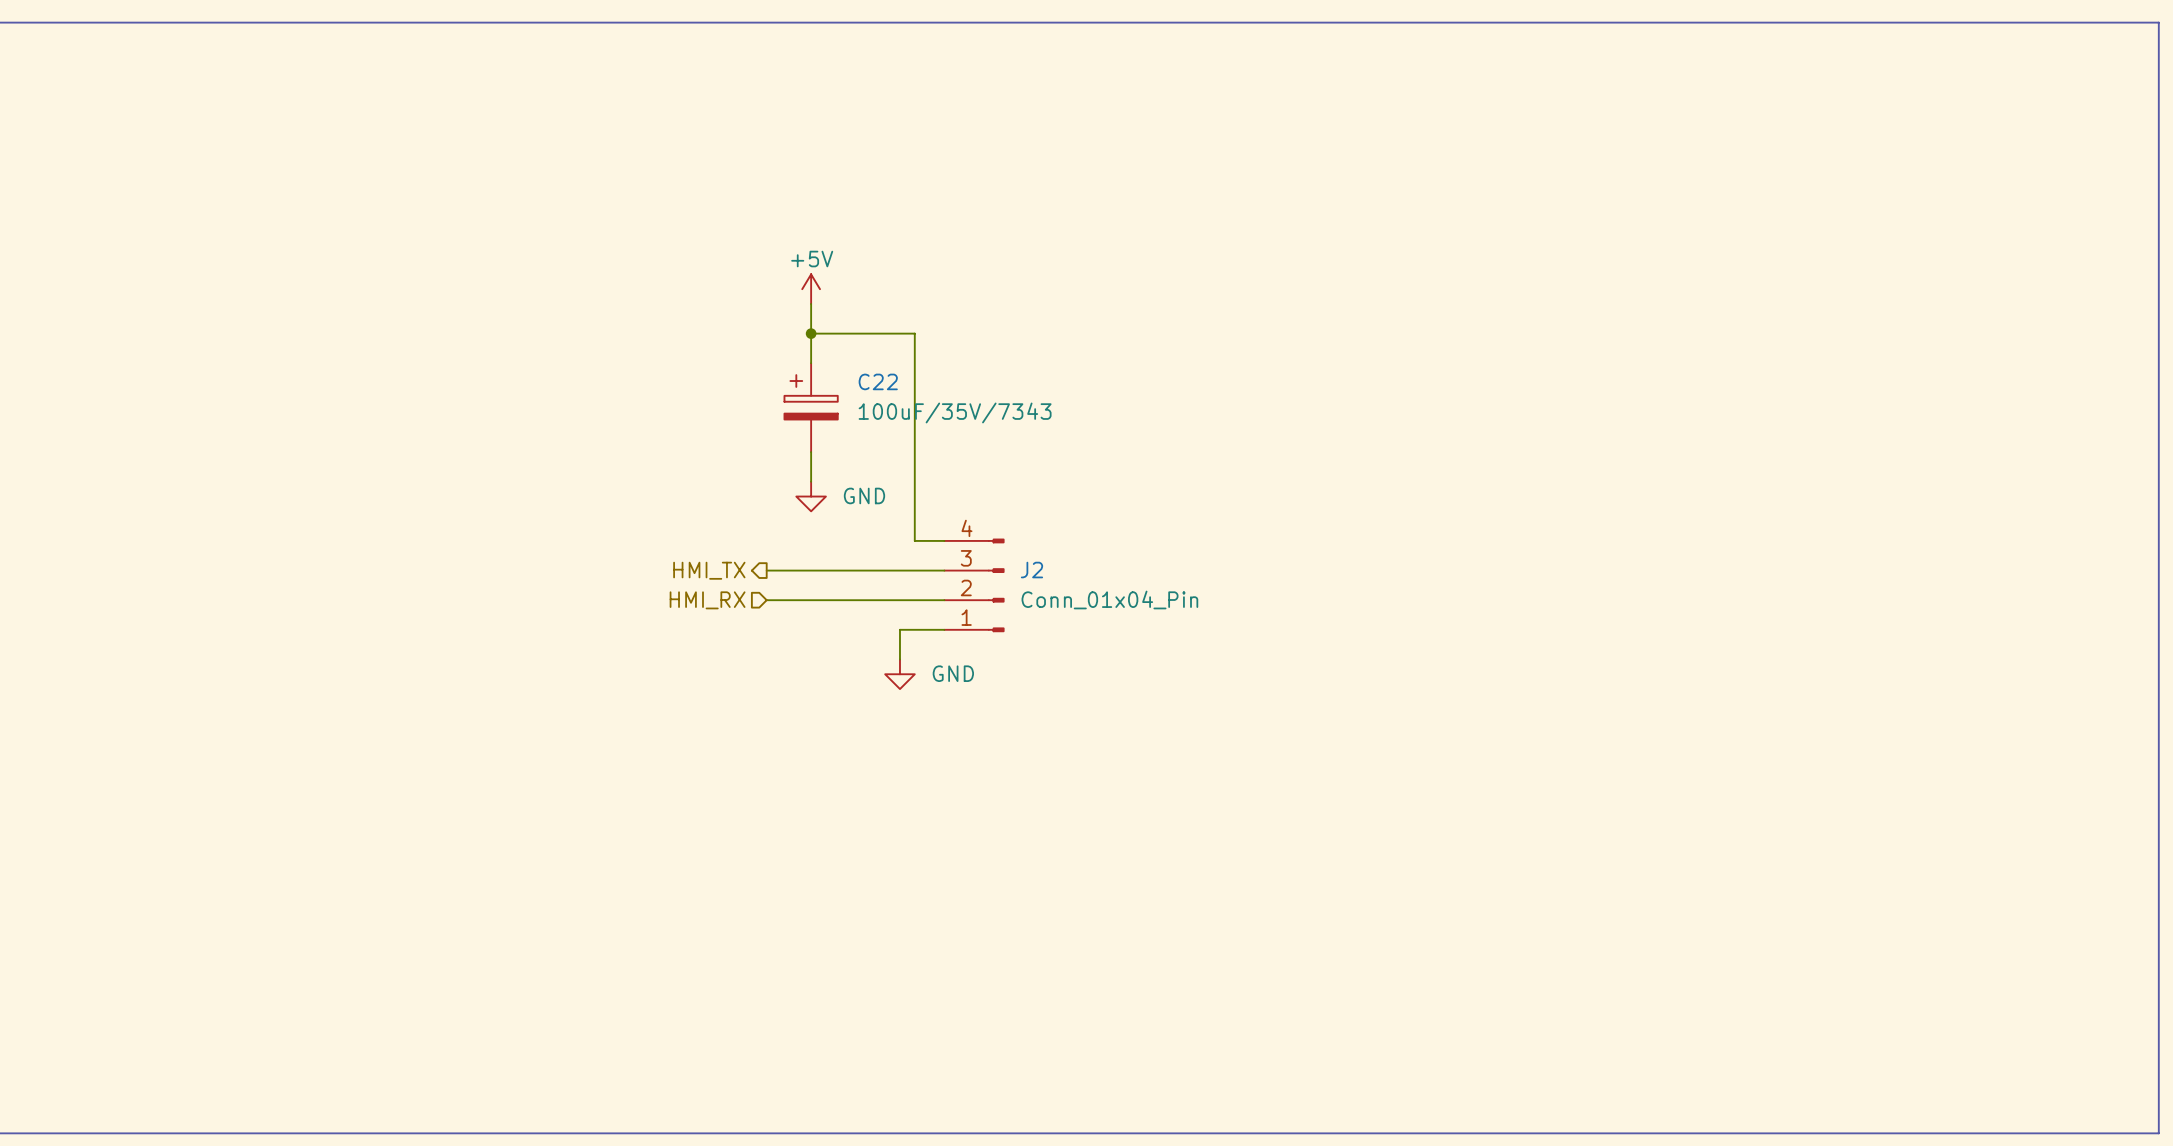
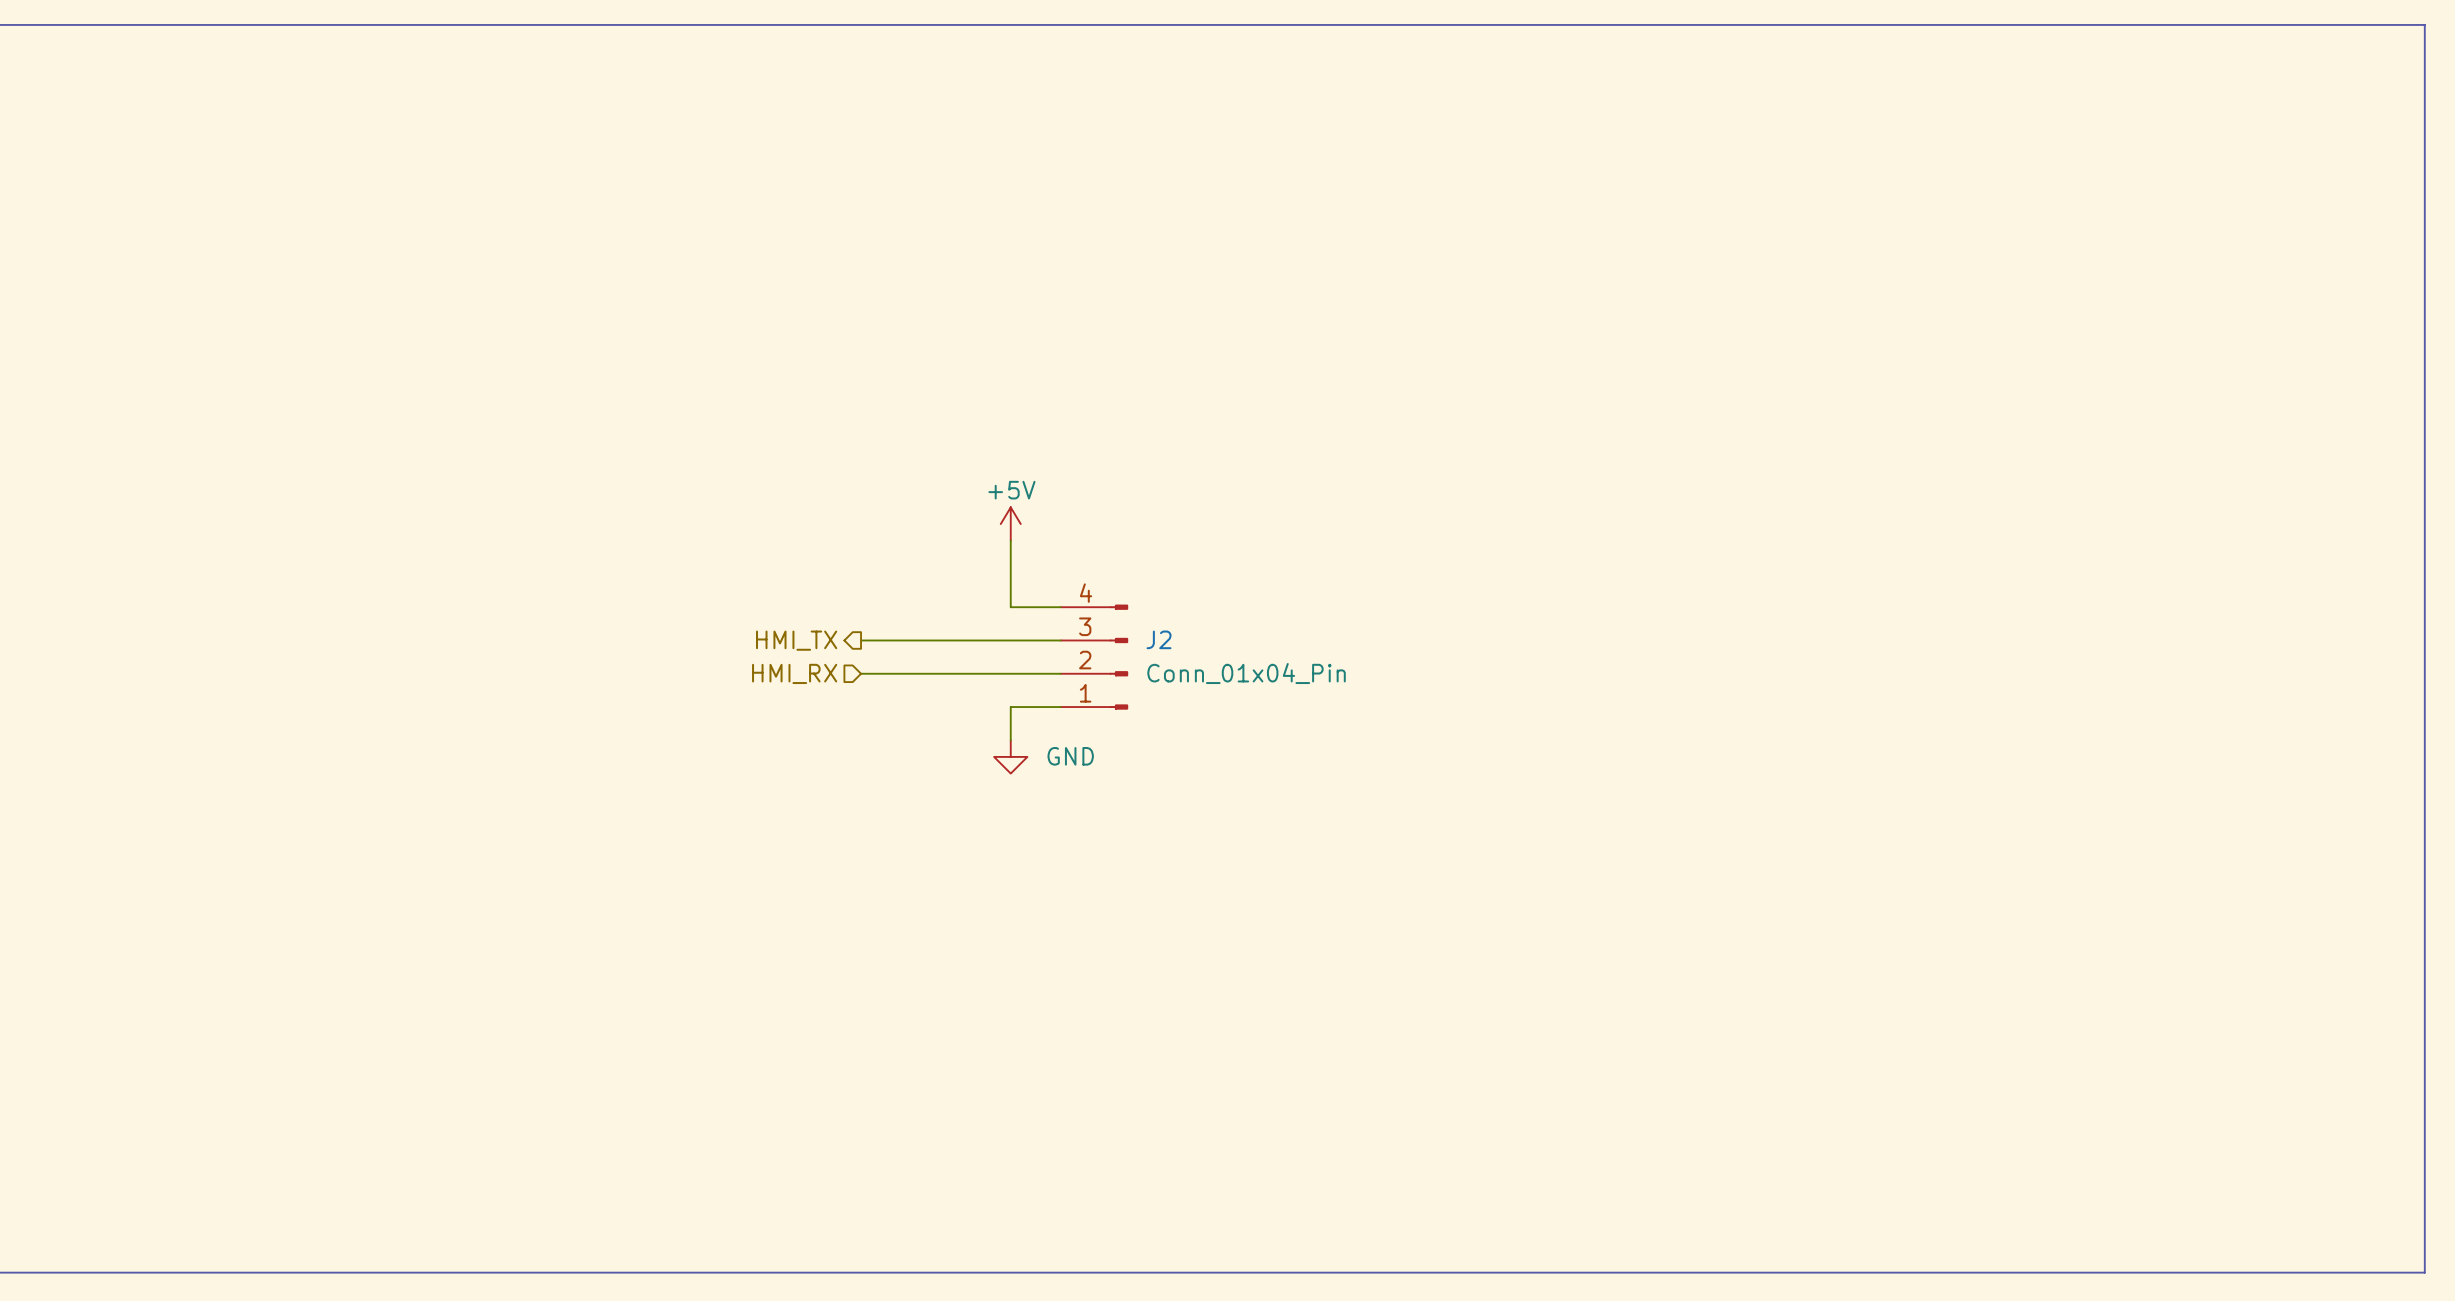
power symbol position: +5V (811, 289) -> +5V (1010, 524)
wire: (811, 304) (811, 363) -> none
wire: (811, 333) (914, 333) (914, 540) -> (1010, 540) (1010, 607) (1027, 607)
junction: (811, 333) -> none
C22: 100uF/35V/7343 (811, 407) -> none
wire: (811, 452) (811, 481) -> none
power symbol: GND (811, 496) -> none

